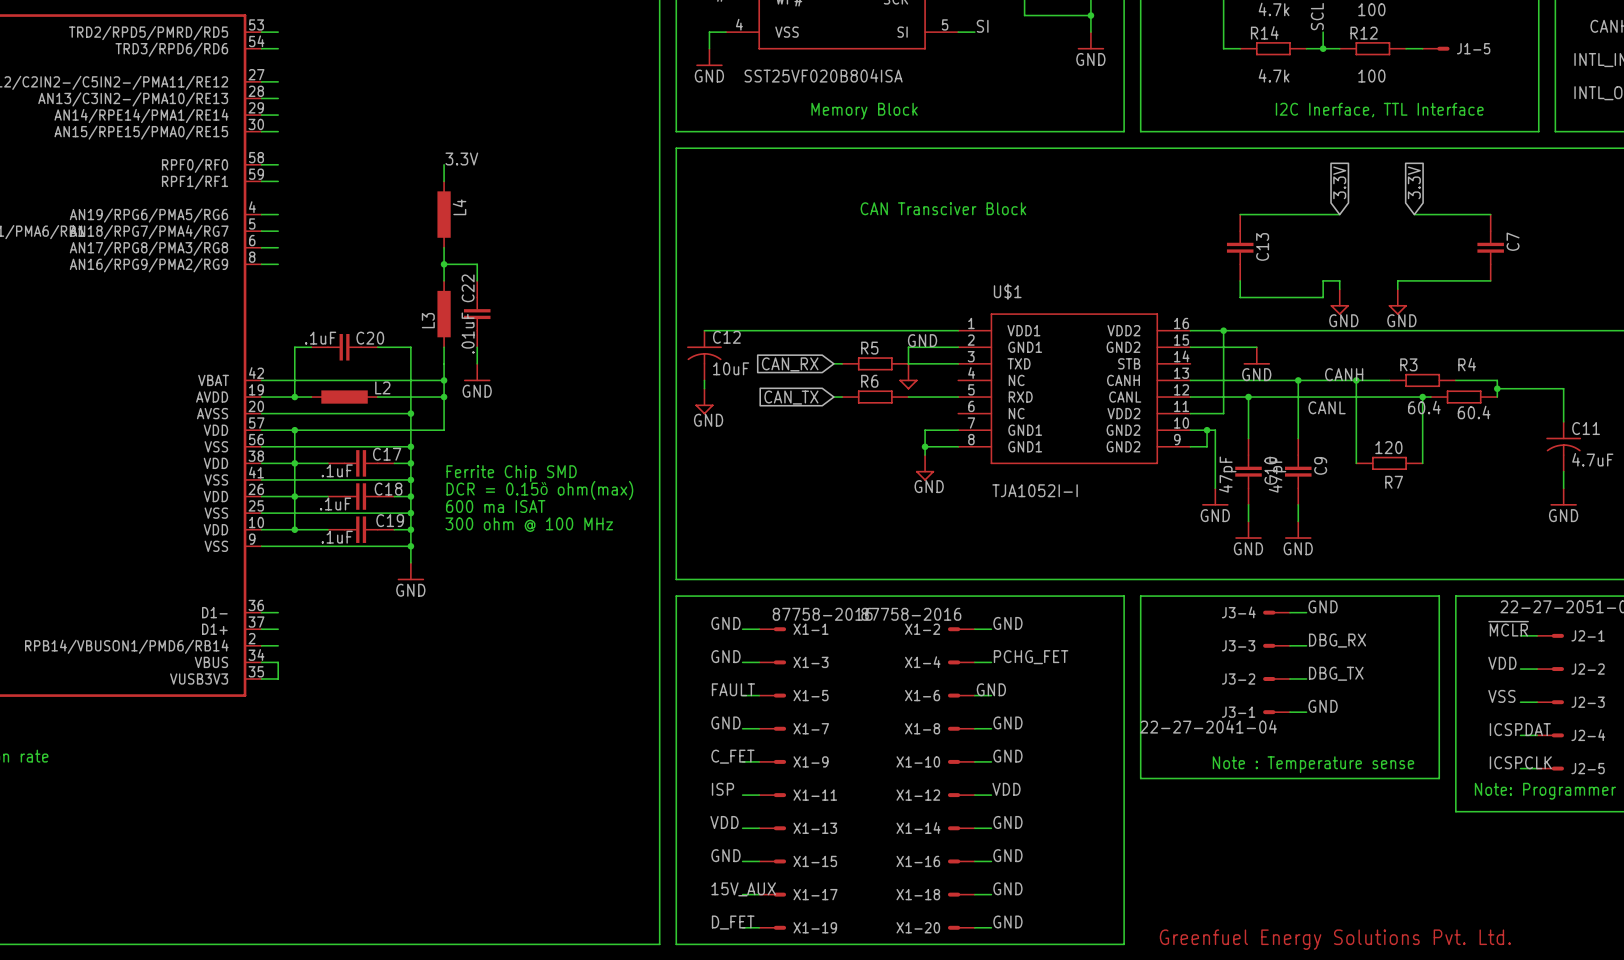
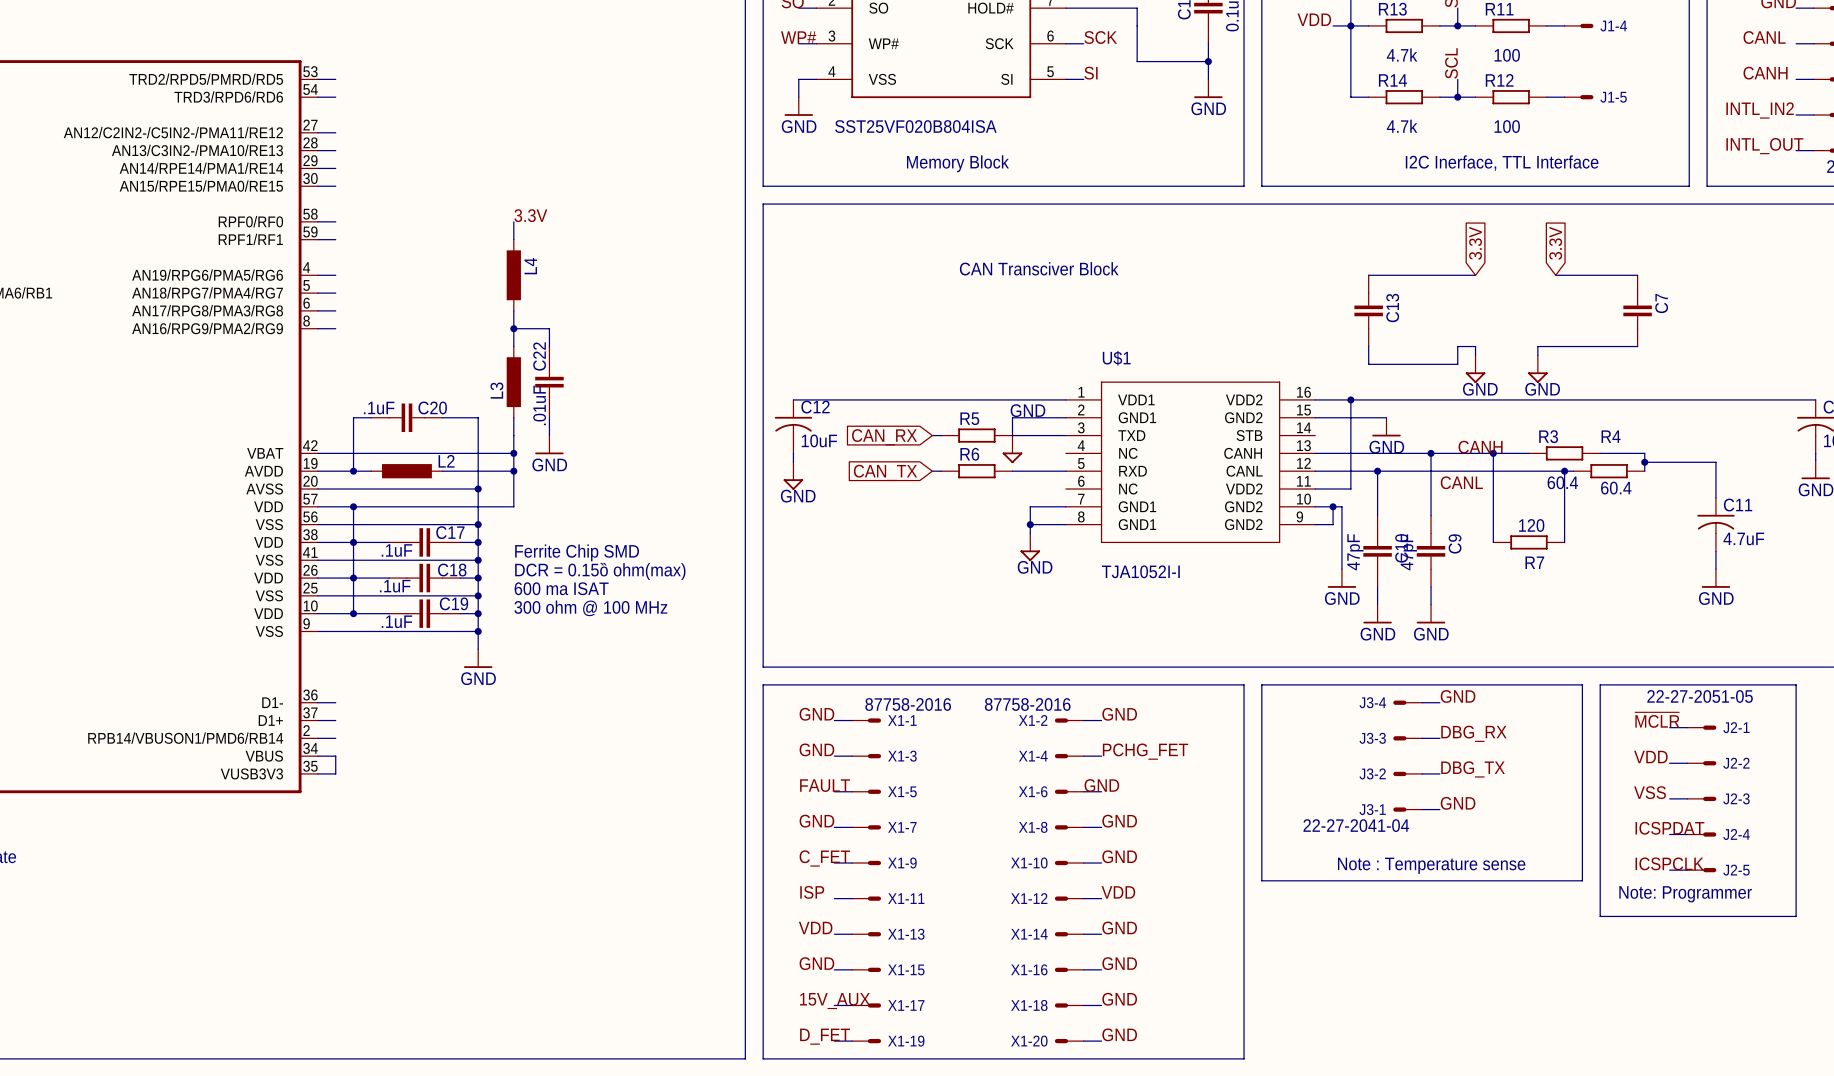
text: Greenfuel Energy Solutions Pvt. Ltd. (1335, 939) -> none

